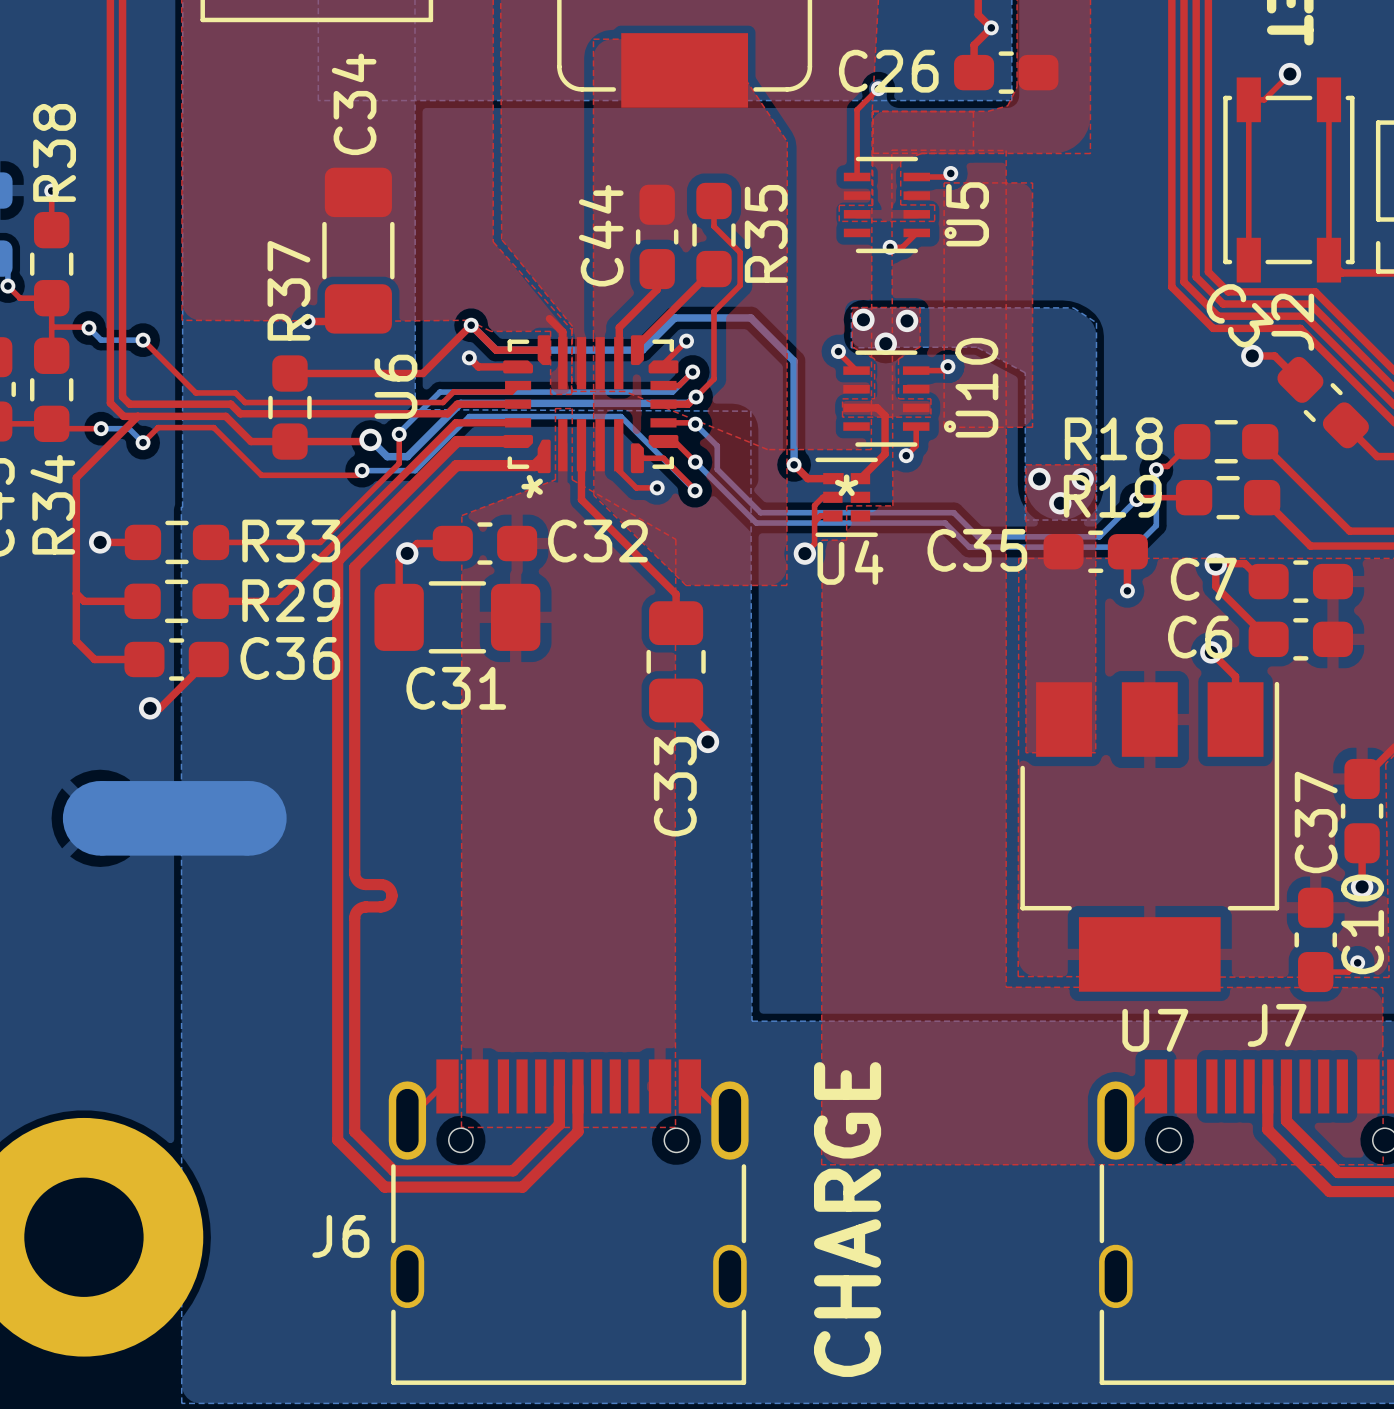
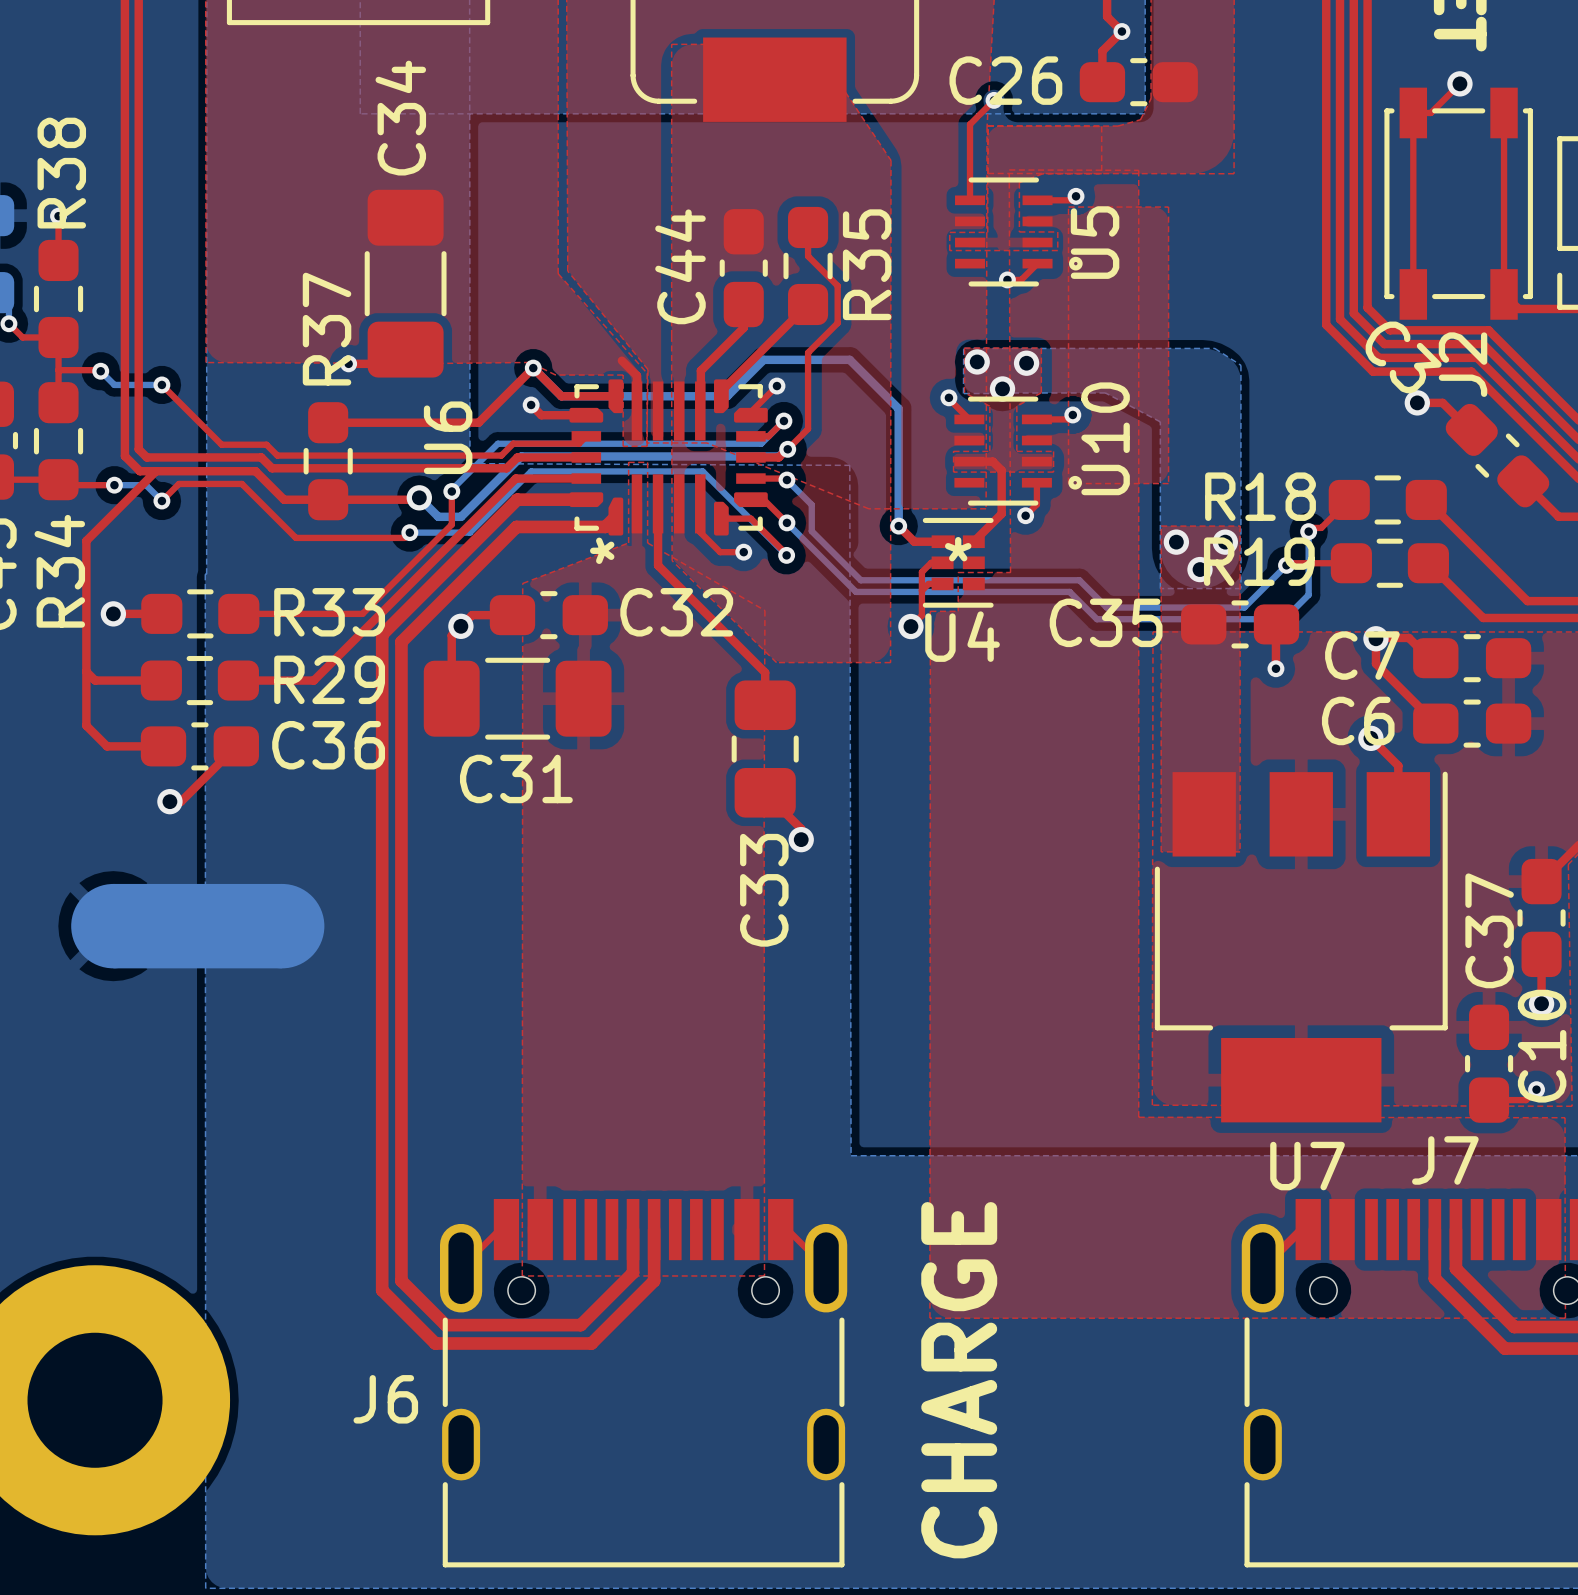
top track: (354, 873) (360, 883) (385, 885) (390, 890) (391, 895) (386, 905) (361, 907) (357, 911) (354, 918) -> (401, 988) (401, 1039)

